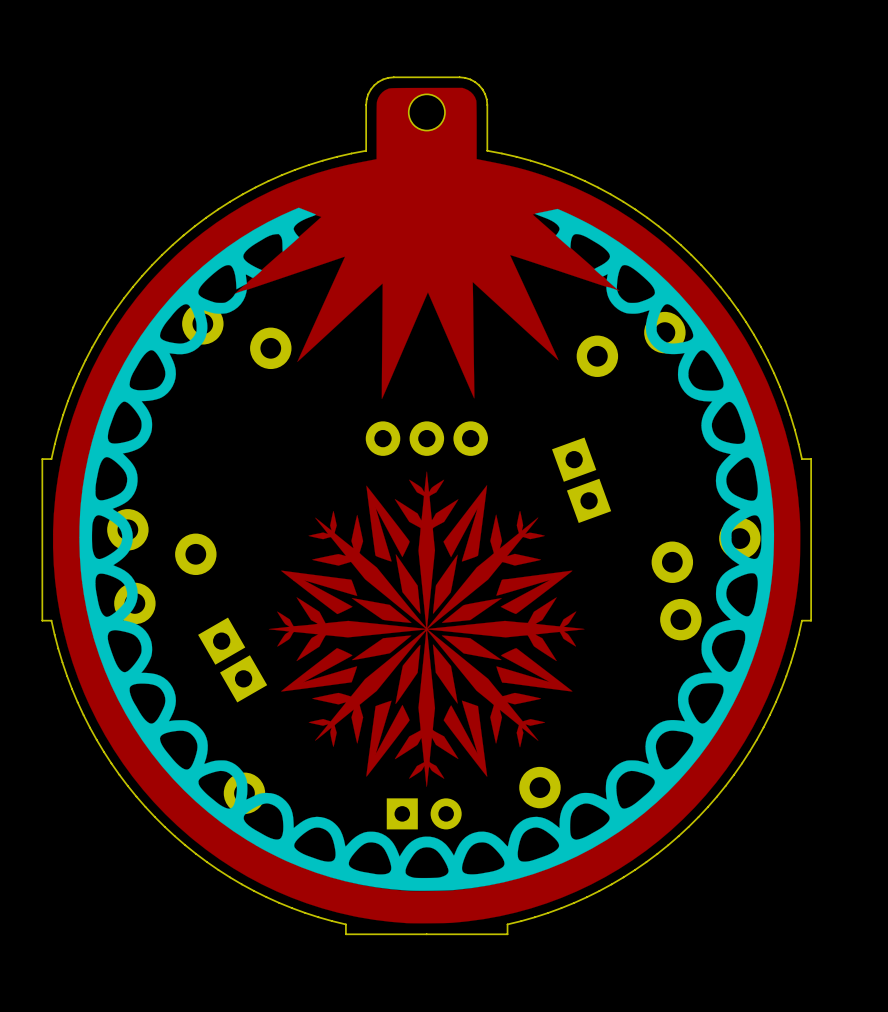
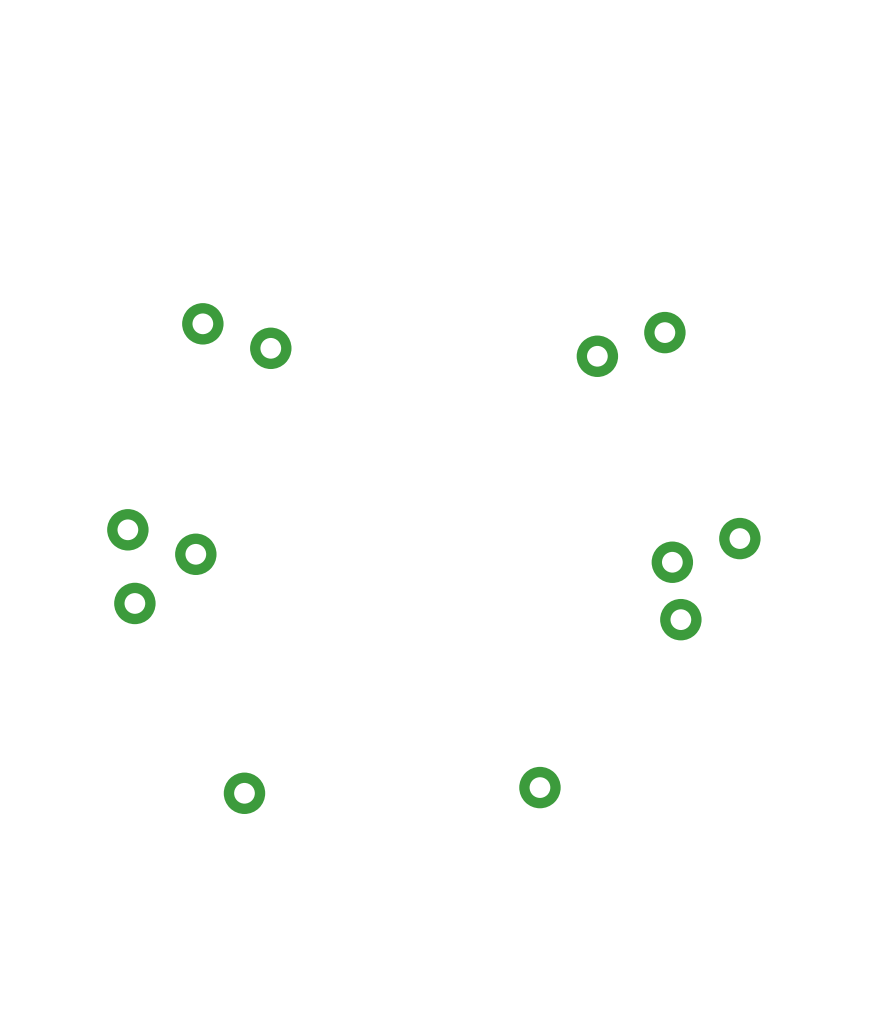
board edge: (393, 77) (378, 82) (368, 94) (366, 105) (366, 150) (337, 156) (295, 169) (255, 187) (218, 209) (183, 235) (152, 265) (124, 298) (107, 322) (85, 360) (73, 387) (58, 429) (51, 459) (42, 459) (42, 620) (51, 620) (62, 662) (77, 702) (96, 739) (119, 774) (164, 826) (218, 869) (254, 891) (279, 902) (318, 917) (345, 924) (345, 934) (507, 934) (507, 924) (548, 912) (586, 897) (623, 877) (657, 853) (707, 807) (749, 751) (781, 689) (795, 648) (801, 620) (811, 620) (811, 459) (801, 459) (785, 401) (774, 373) (753, 334) (720, 286) (680, 244) (635, 209) (585, 181) (530, 160) (487, 150) (486, 99) (482, 89) (475, 82) (459, 77) (393, 77) -> none
drawing: [52, 87, 801, 924] -> none
part: (426, 112) -> none
part: (426, 438) -> none
part: (574, 459) -> none
part: (589, 500) -> none
part: (221, 641) -> none
part: (243, 678) -> none
part: (424, 813) -> none

